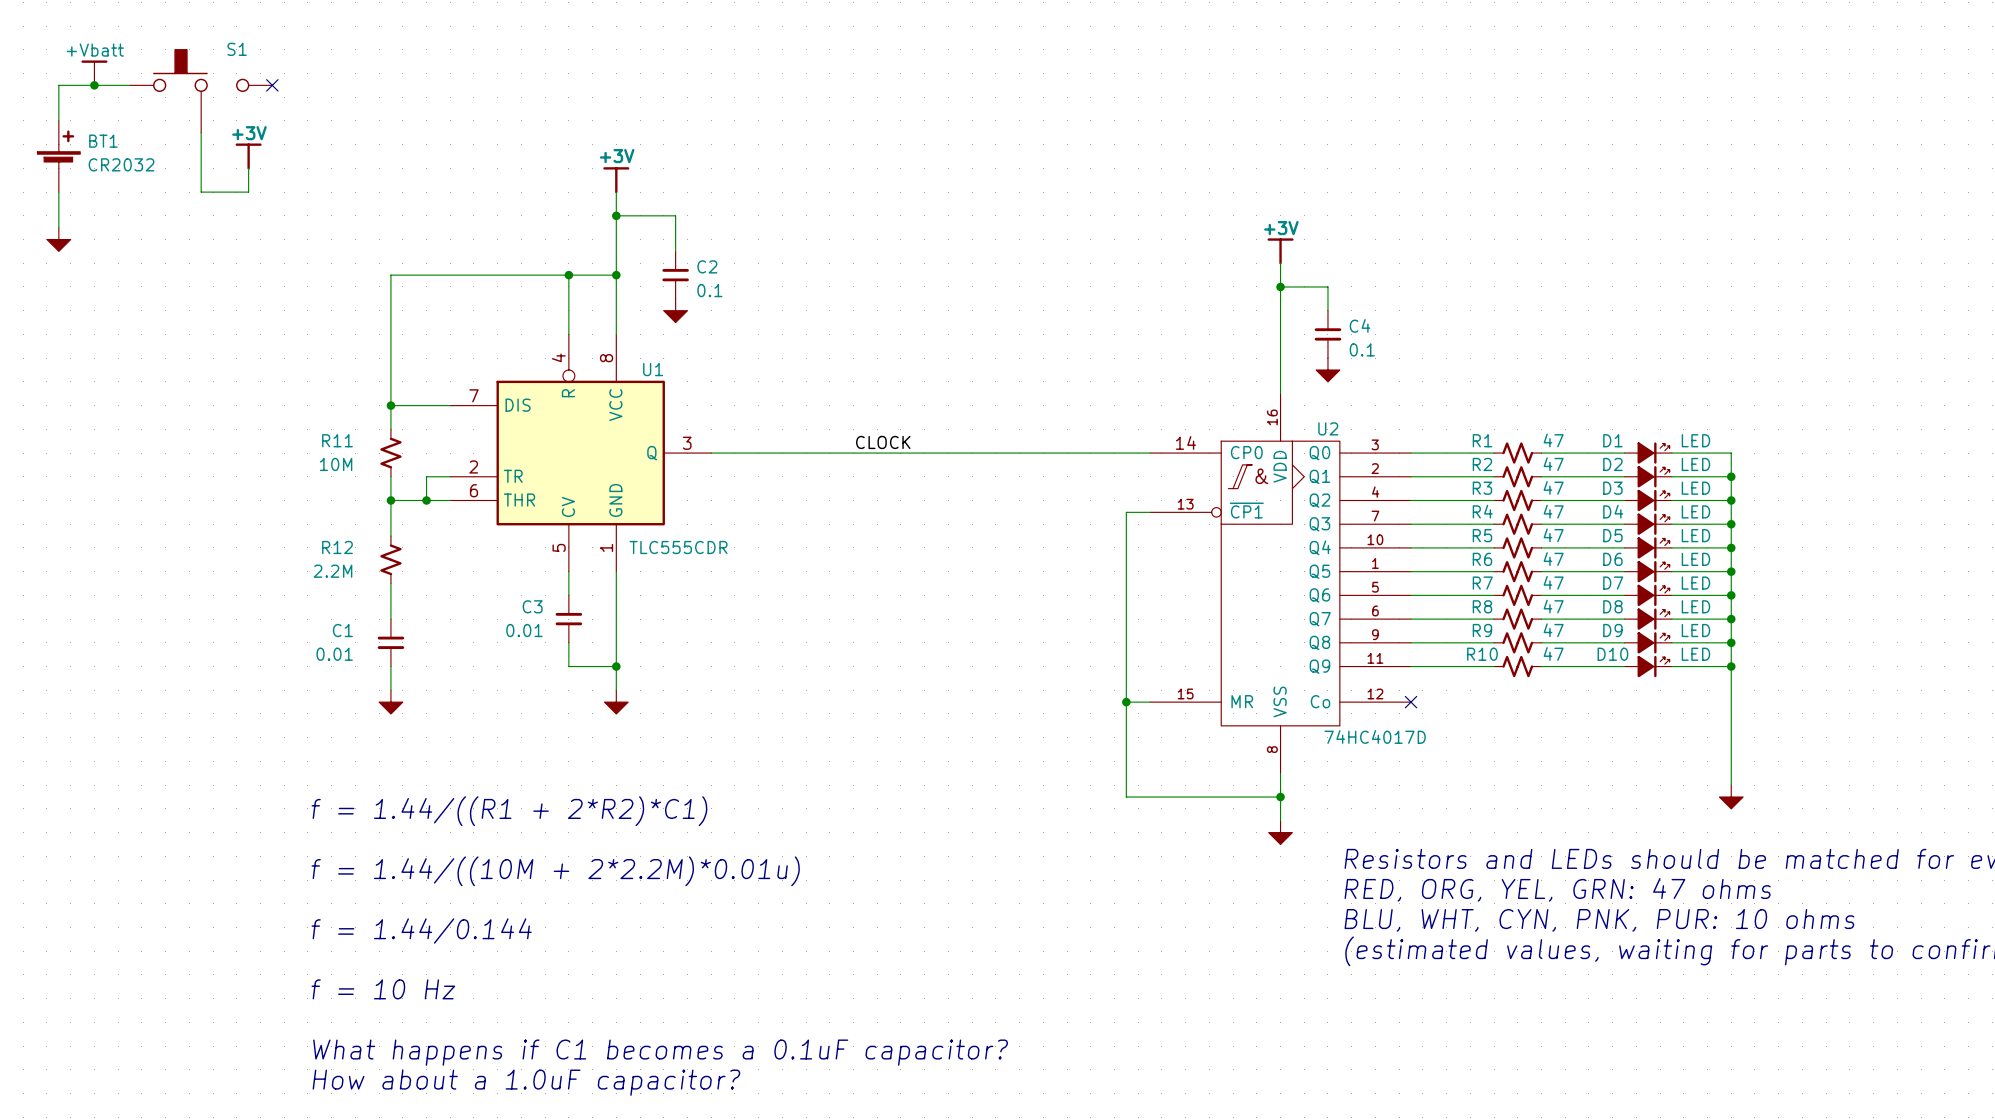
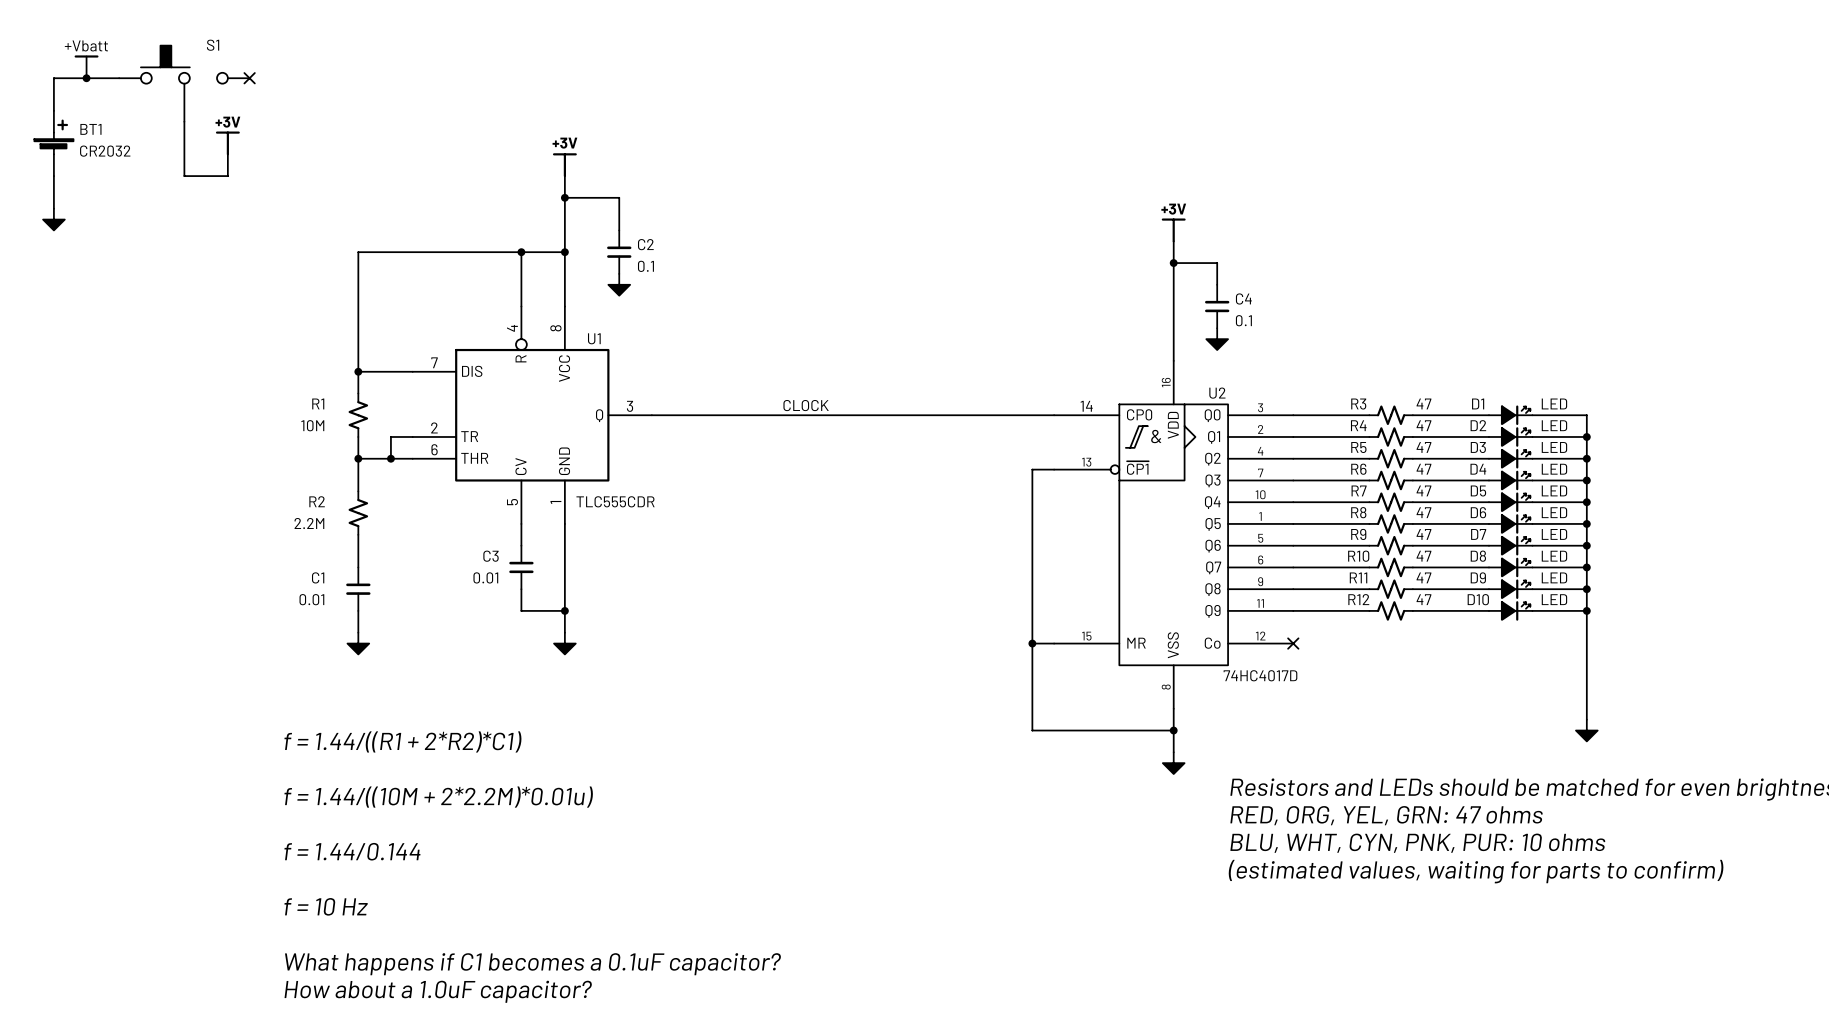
R11 name: R11 (337, 440) -> R1 (318, 403)
R1 name: R1 (1482, 440) -> R3 (1358, 404)
R2 name: R2 (1482, 464) -> R4 (1358, 425)
R3 name: R3 (1482, 488) -> R5 (1358, 447)
R4 name: R4 (1482, 511) -> R6 (1358, 469)
R5 name: R5 (1482, 535) -> R7 (1359, 490)
R12 name: R12 (337, 547) -> R2 (317, 501)
R6 name: R6 (1482, 559) -> R8 (1358, 512)
R7 name: R7 (1482, 583) -> R9 (1358, 534)
R8 name: R8 (1482, 606) -> R10 (1358, 556)
R9 name: R9 (1482, 630) -> R11 (1358, 577)
R10 name: R10 (1482, 654) -> R12 (1358, 599)

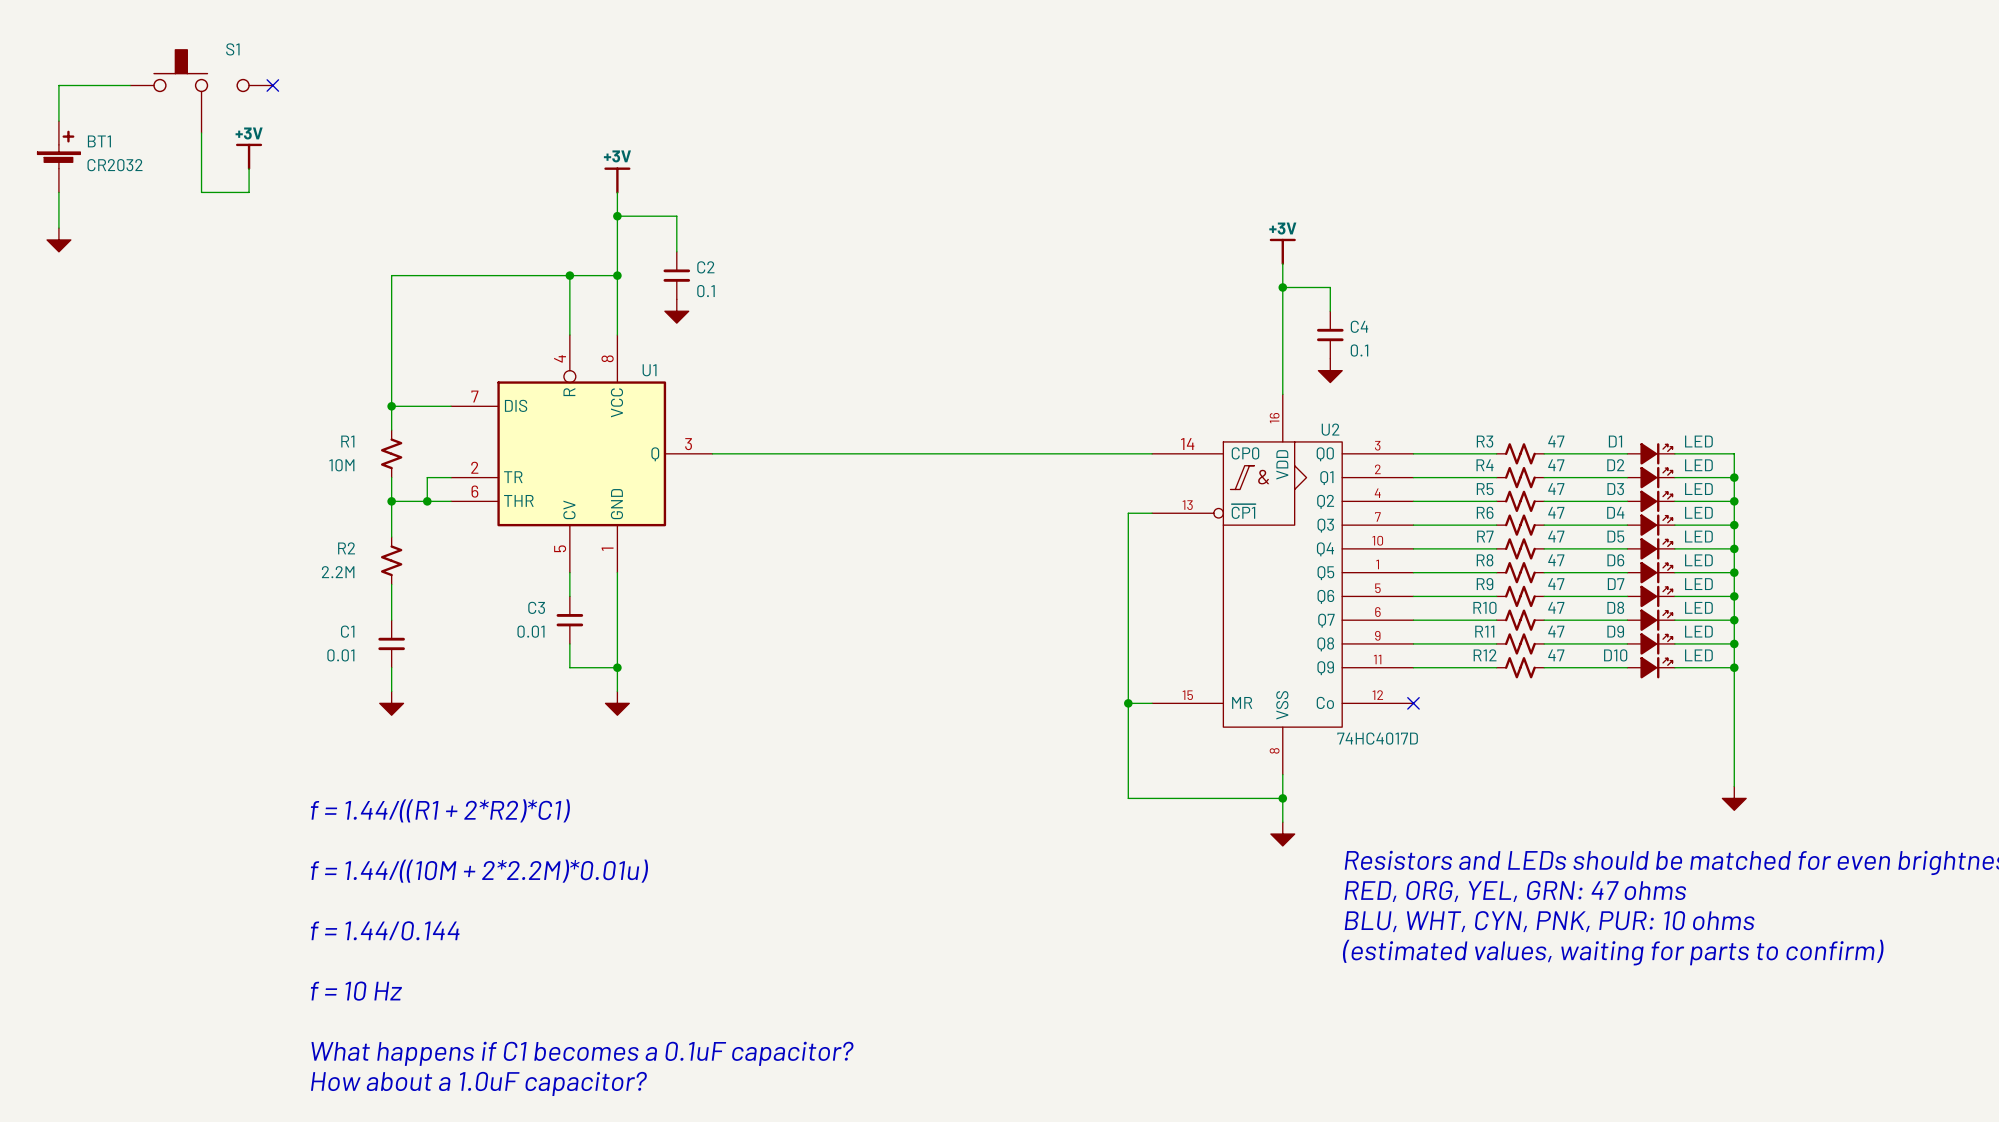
power symbol: +Vbatt (86, 66) -> none
junction: (86, 78) -> none
label: CLOCK (806, 405) -> none
U1 value: TLC555CDR (615, 501) -> none

